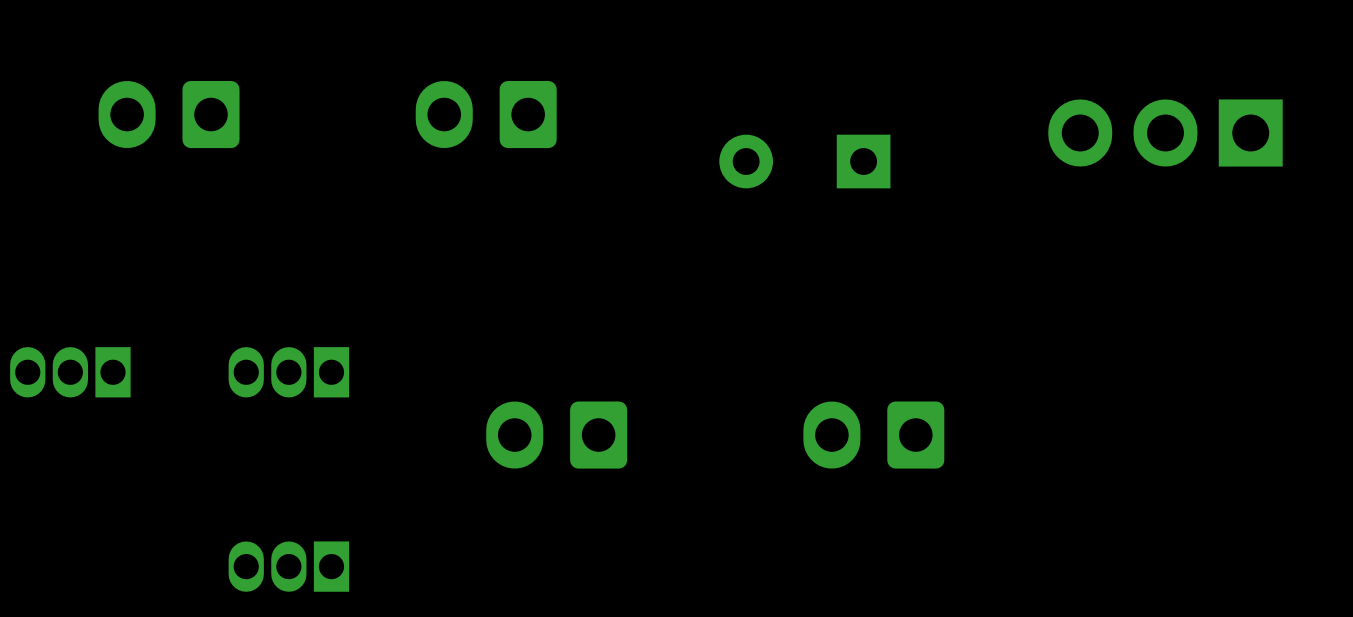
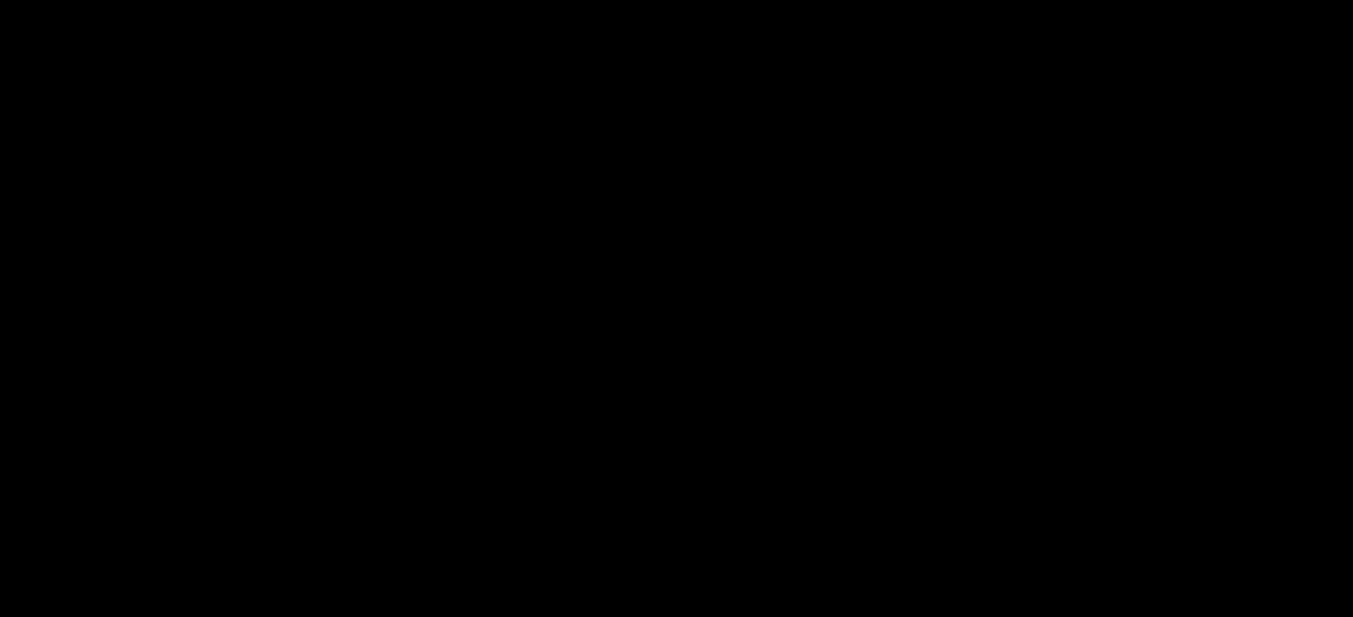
part: (169, 114) -> none
part: (486, 114) -> none
part: (1165, 132) -> none
part: (804, 161) -> none
part: (70, 372) -> none
part: (288, 372) -> none
part: (556, 435) -> none
part: (873, 435) -> none
part: (288, 566) -> none

